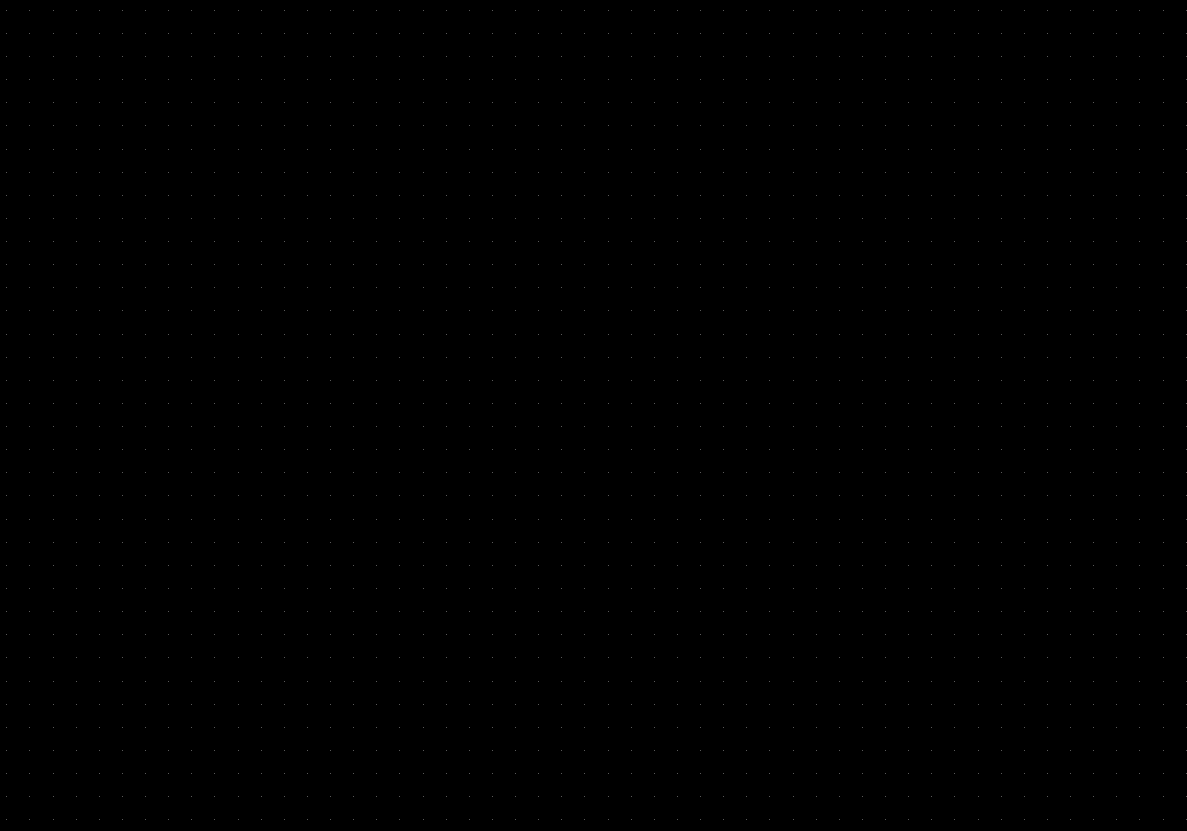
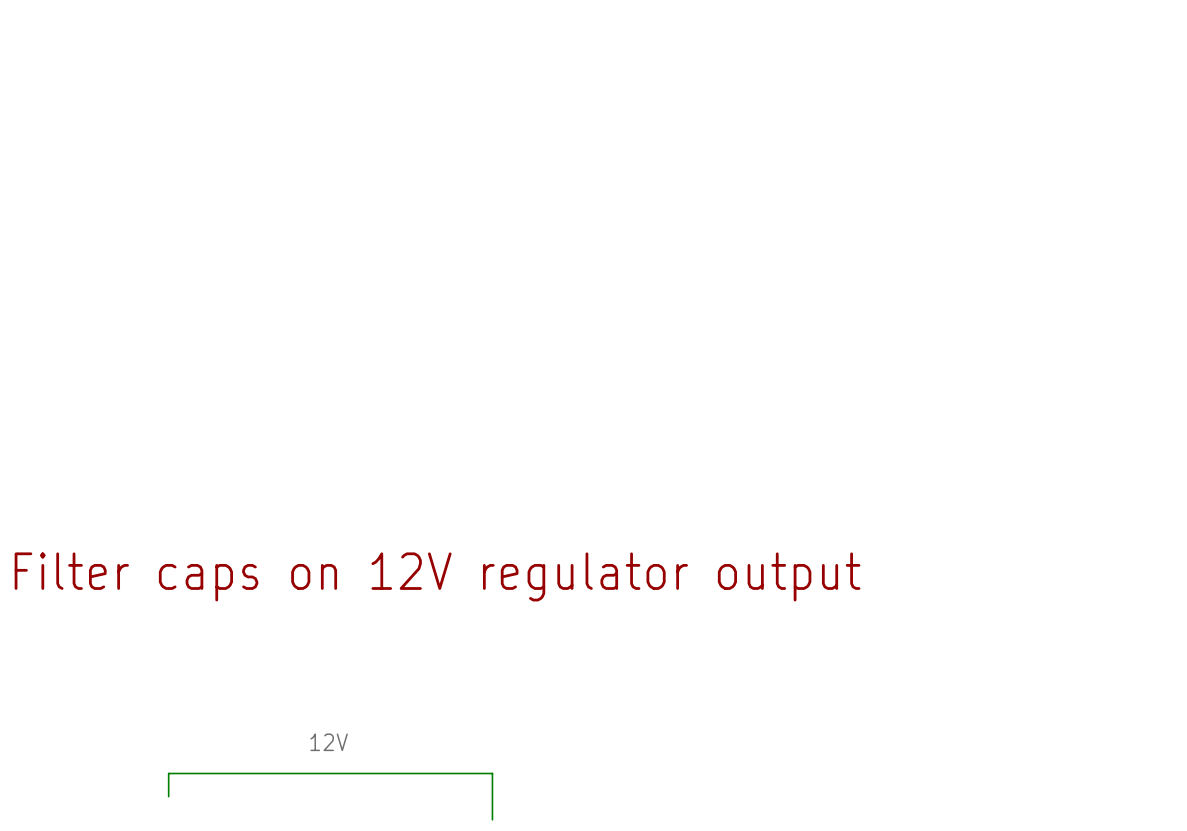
text: none -> Filter caps on 12V regulator output (437, 576)
label: none -> 12V (329, 742)
wire: none -> (168, 796) (168, 773) (492, 773) (492, 819)

